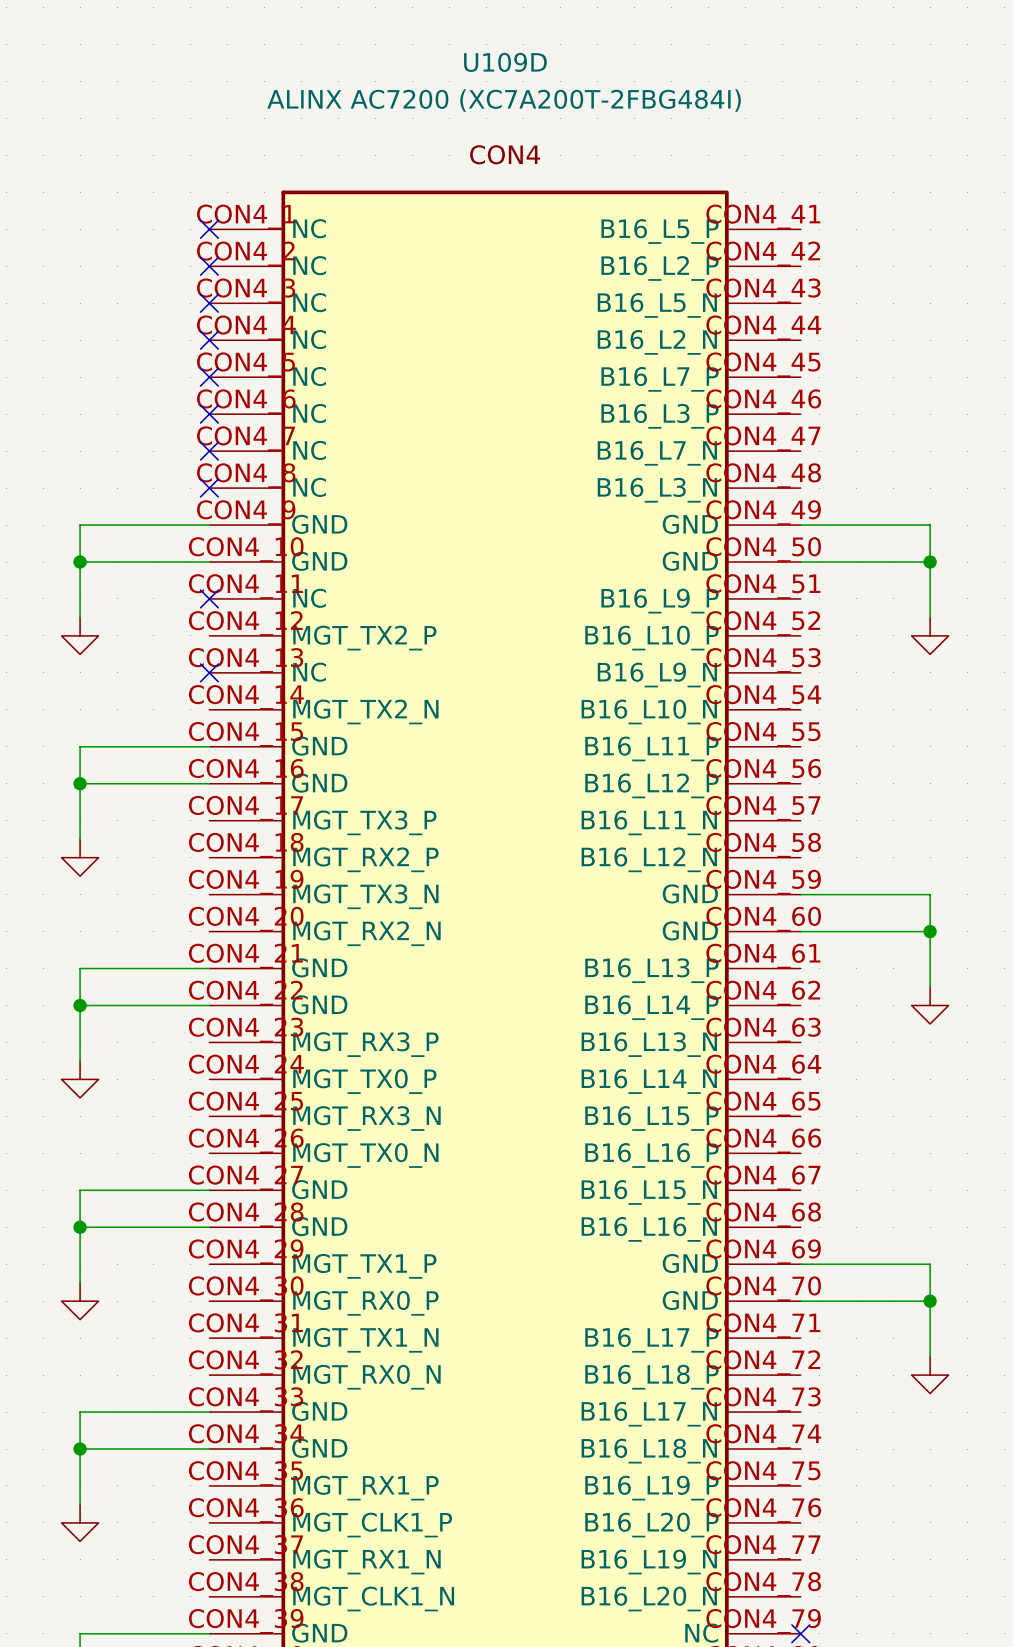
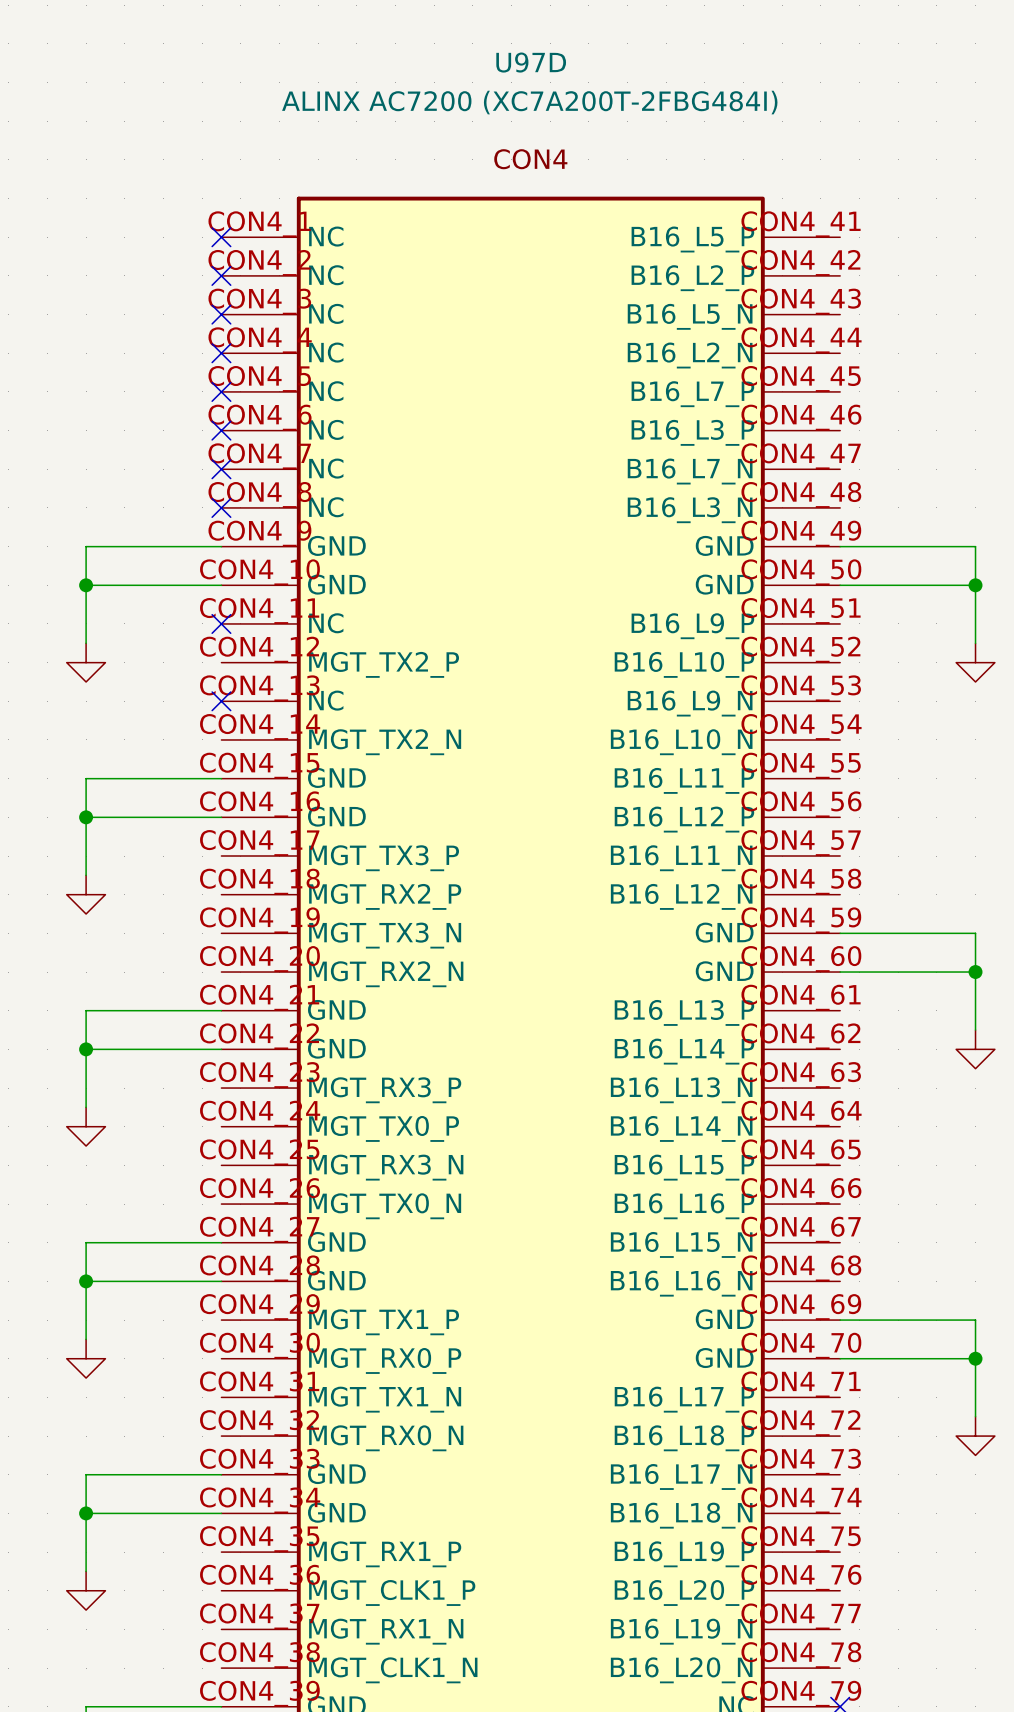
U109D name: U109D (505, 62) -> U97D (531, 62)

